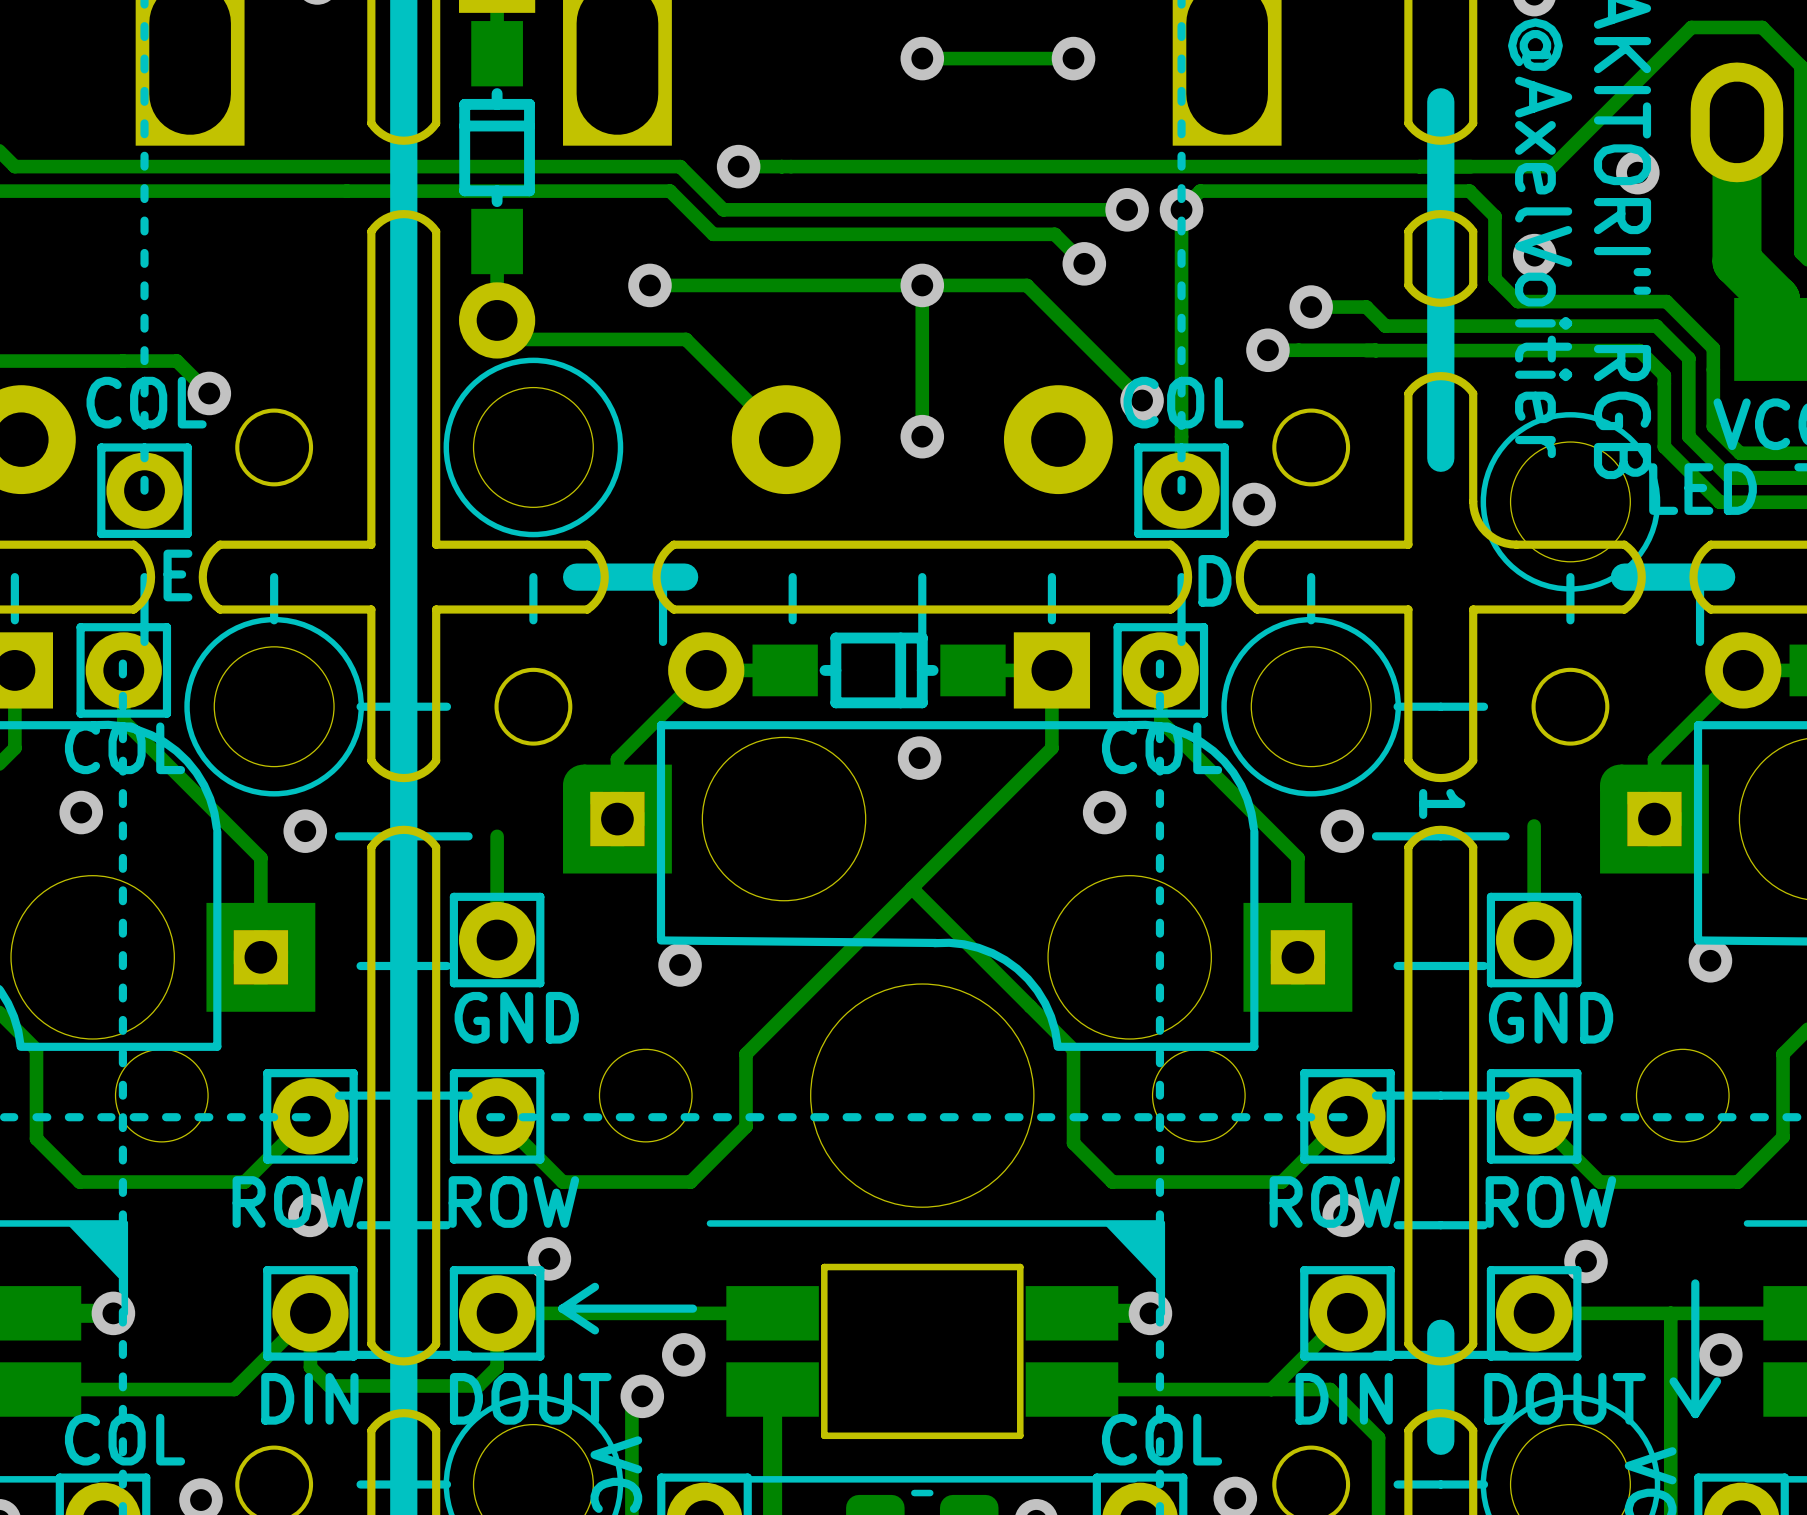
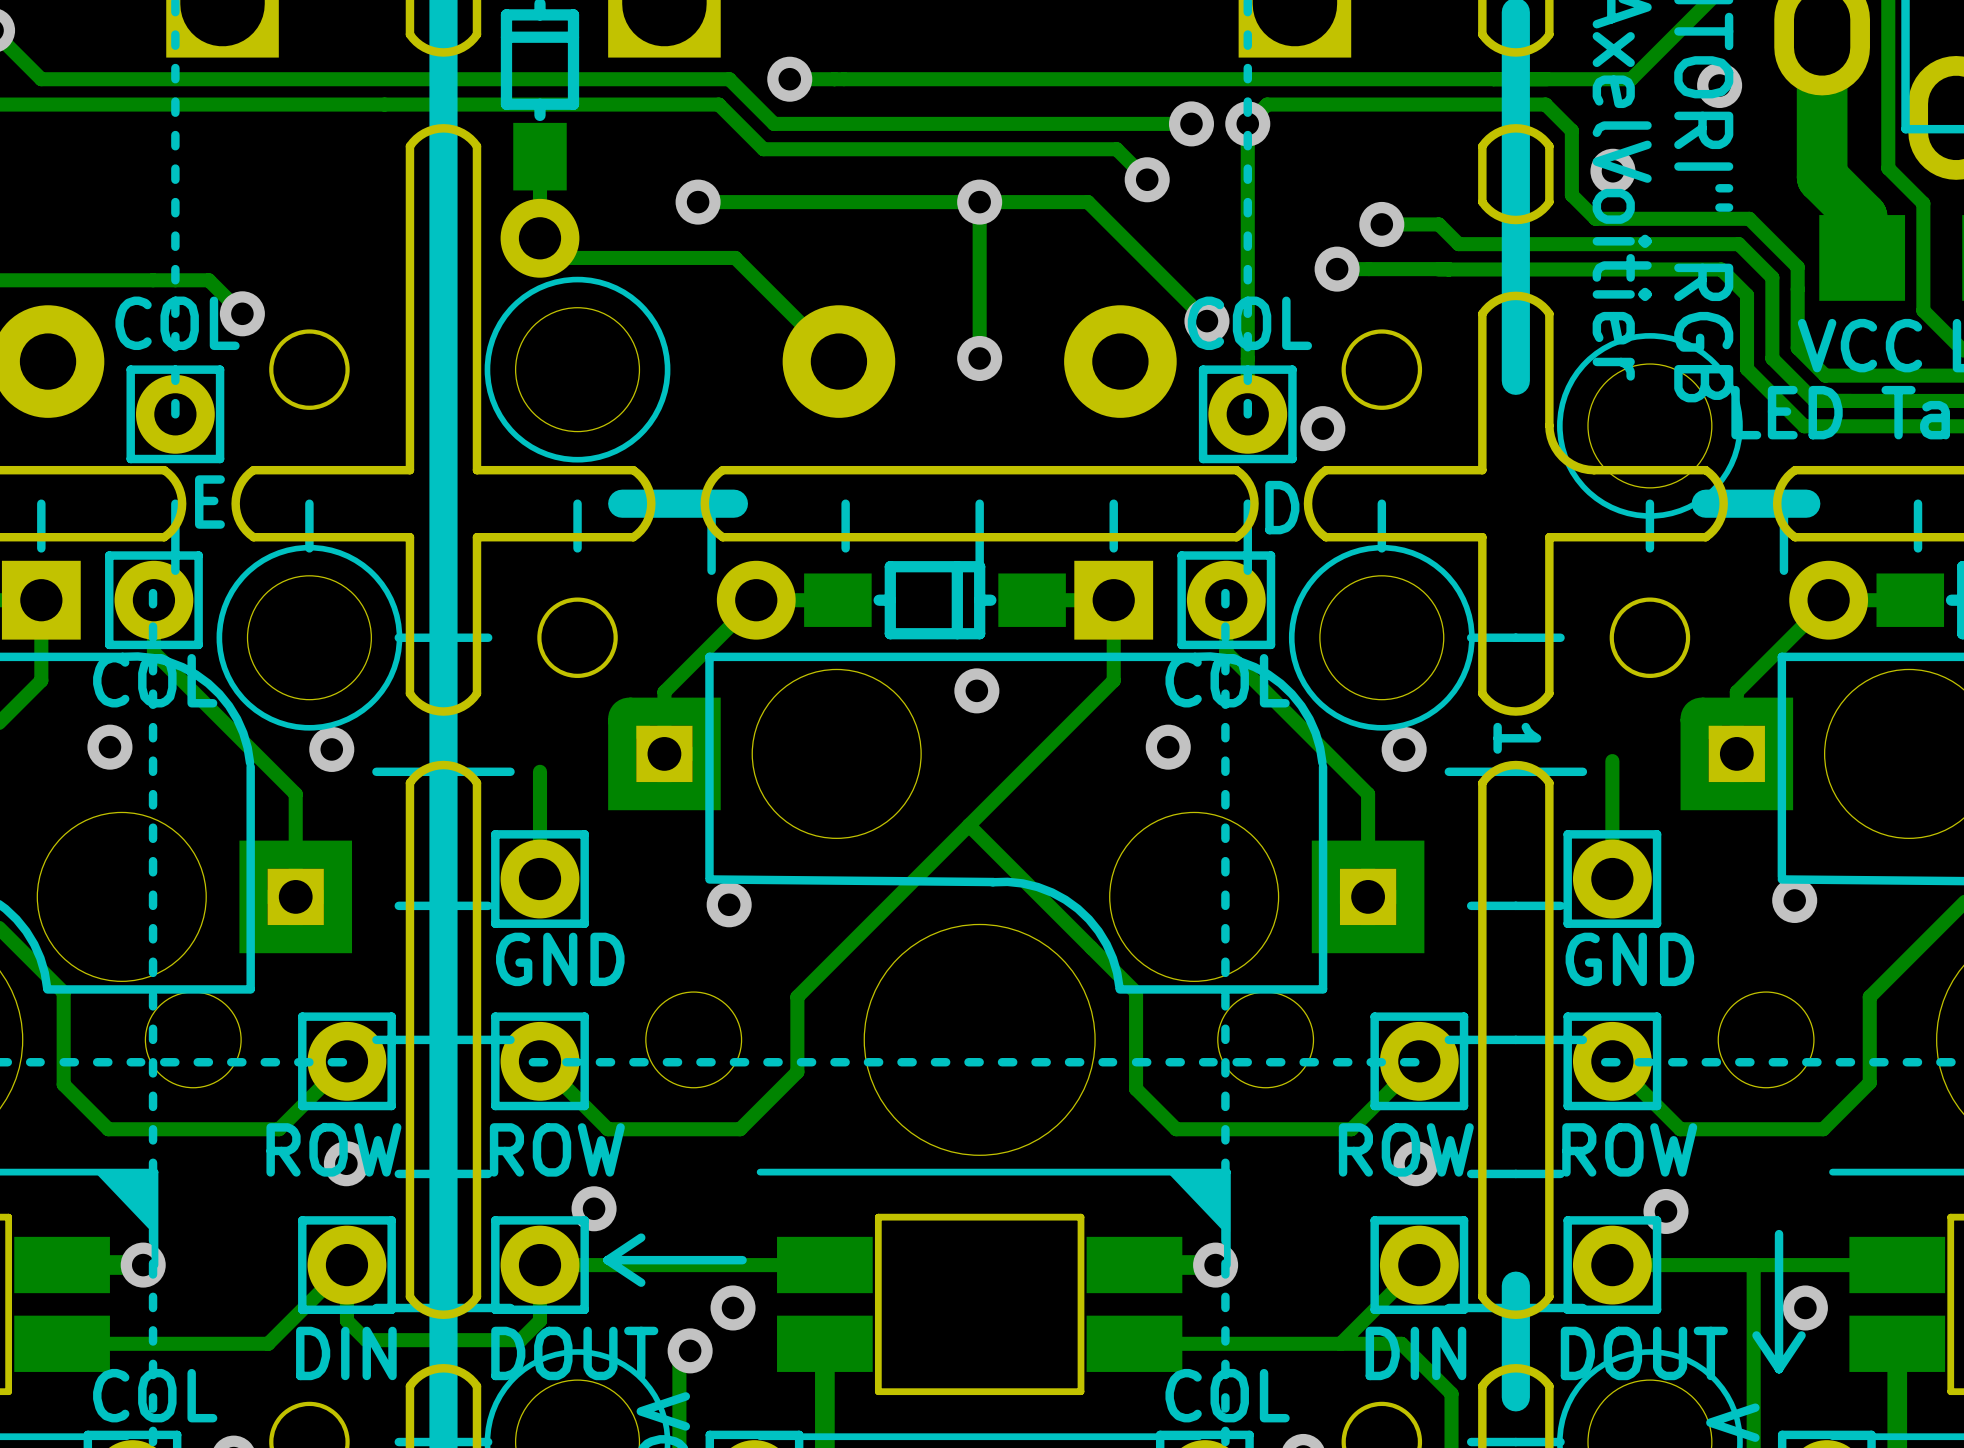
via position: (305, 831) -> (331, 749)
via position: (1342, 831) -> (1404, 749)

